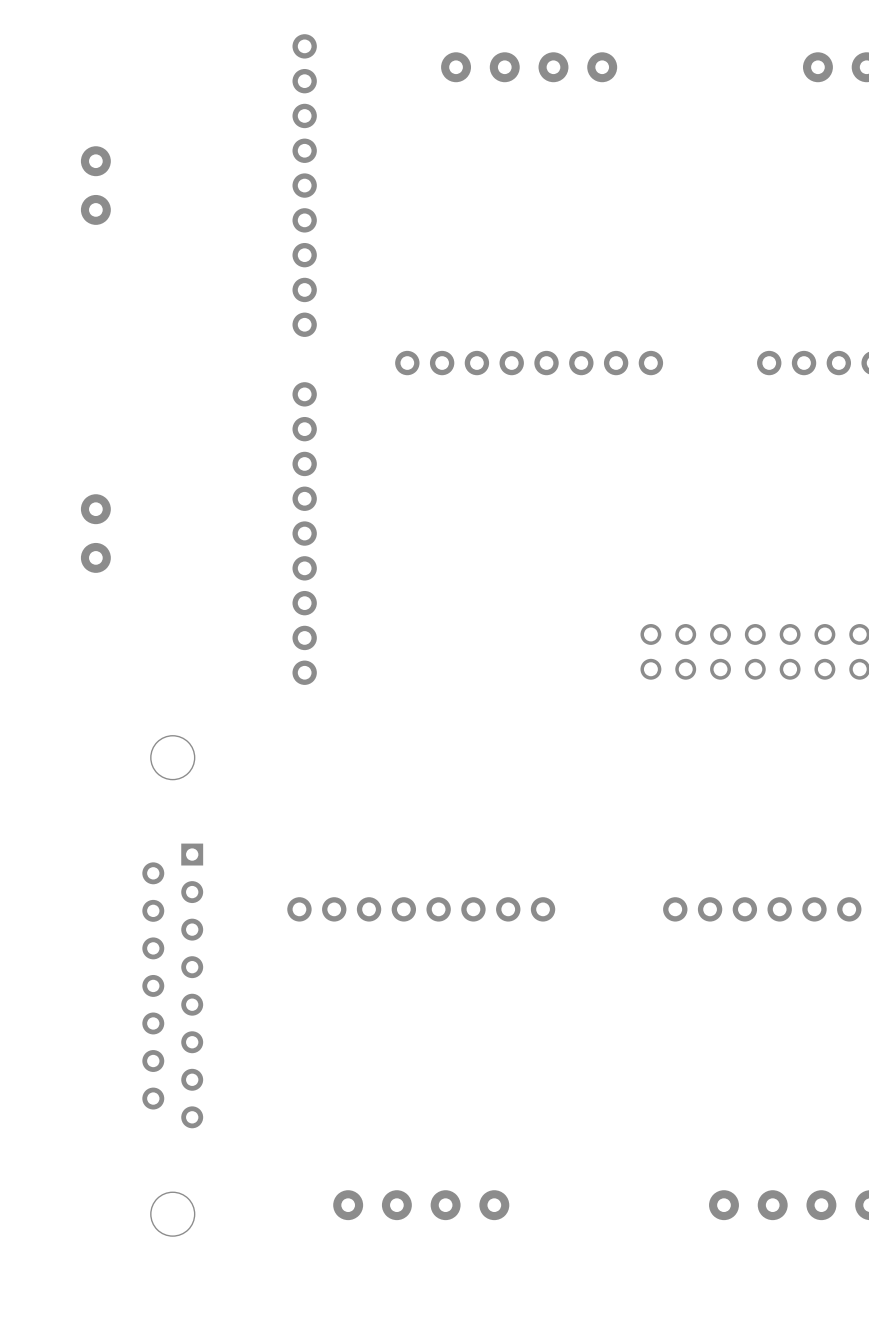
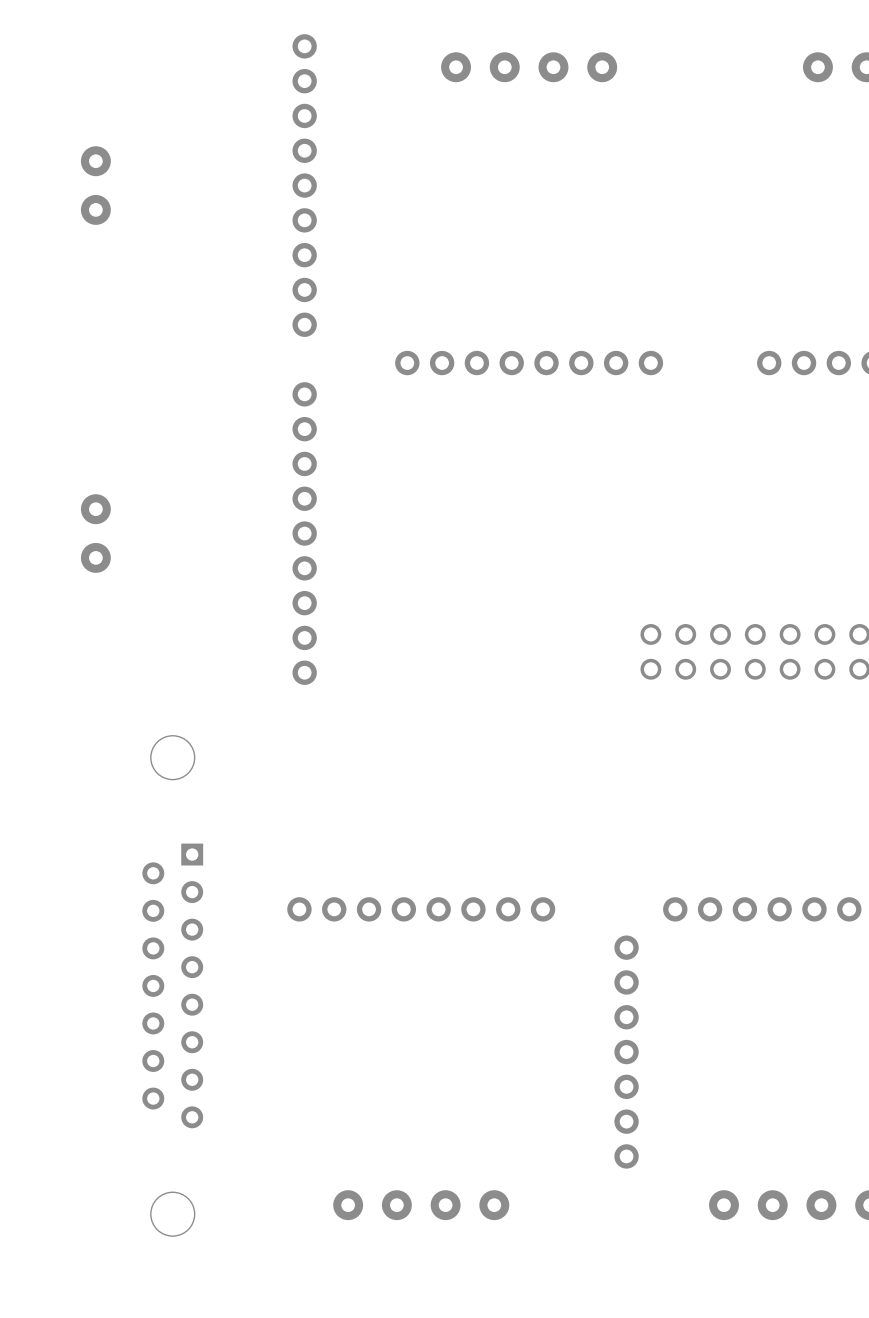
part: none -> (626, 1052)

